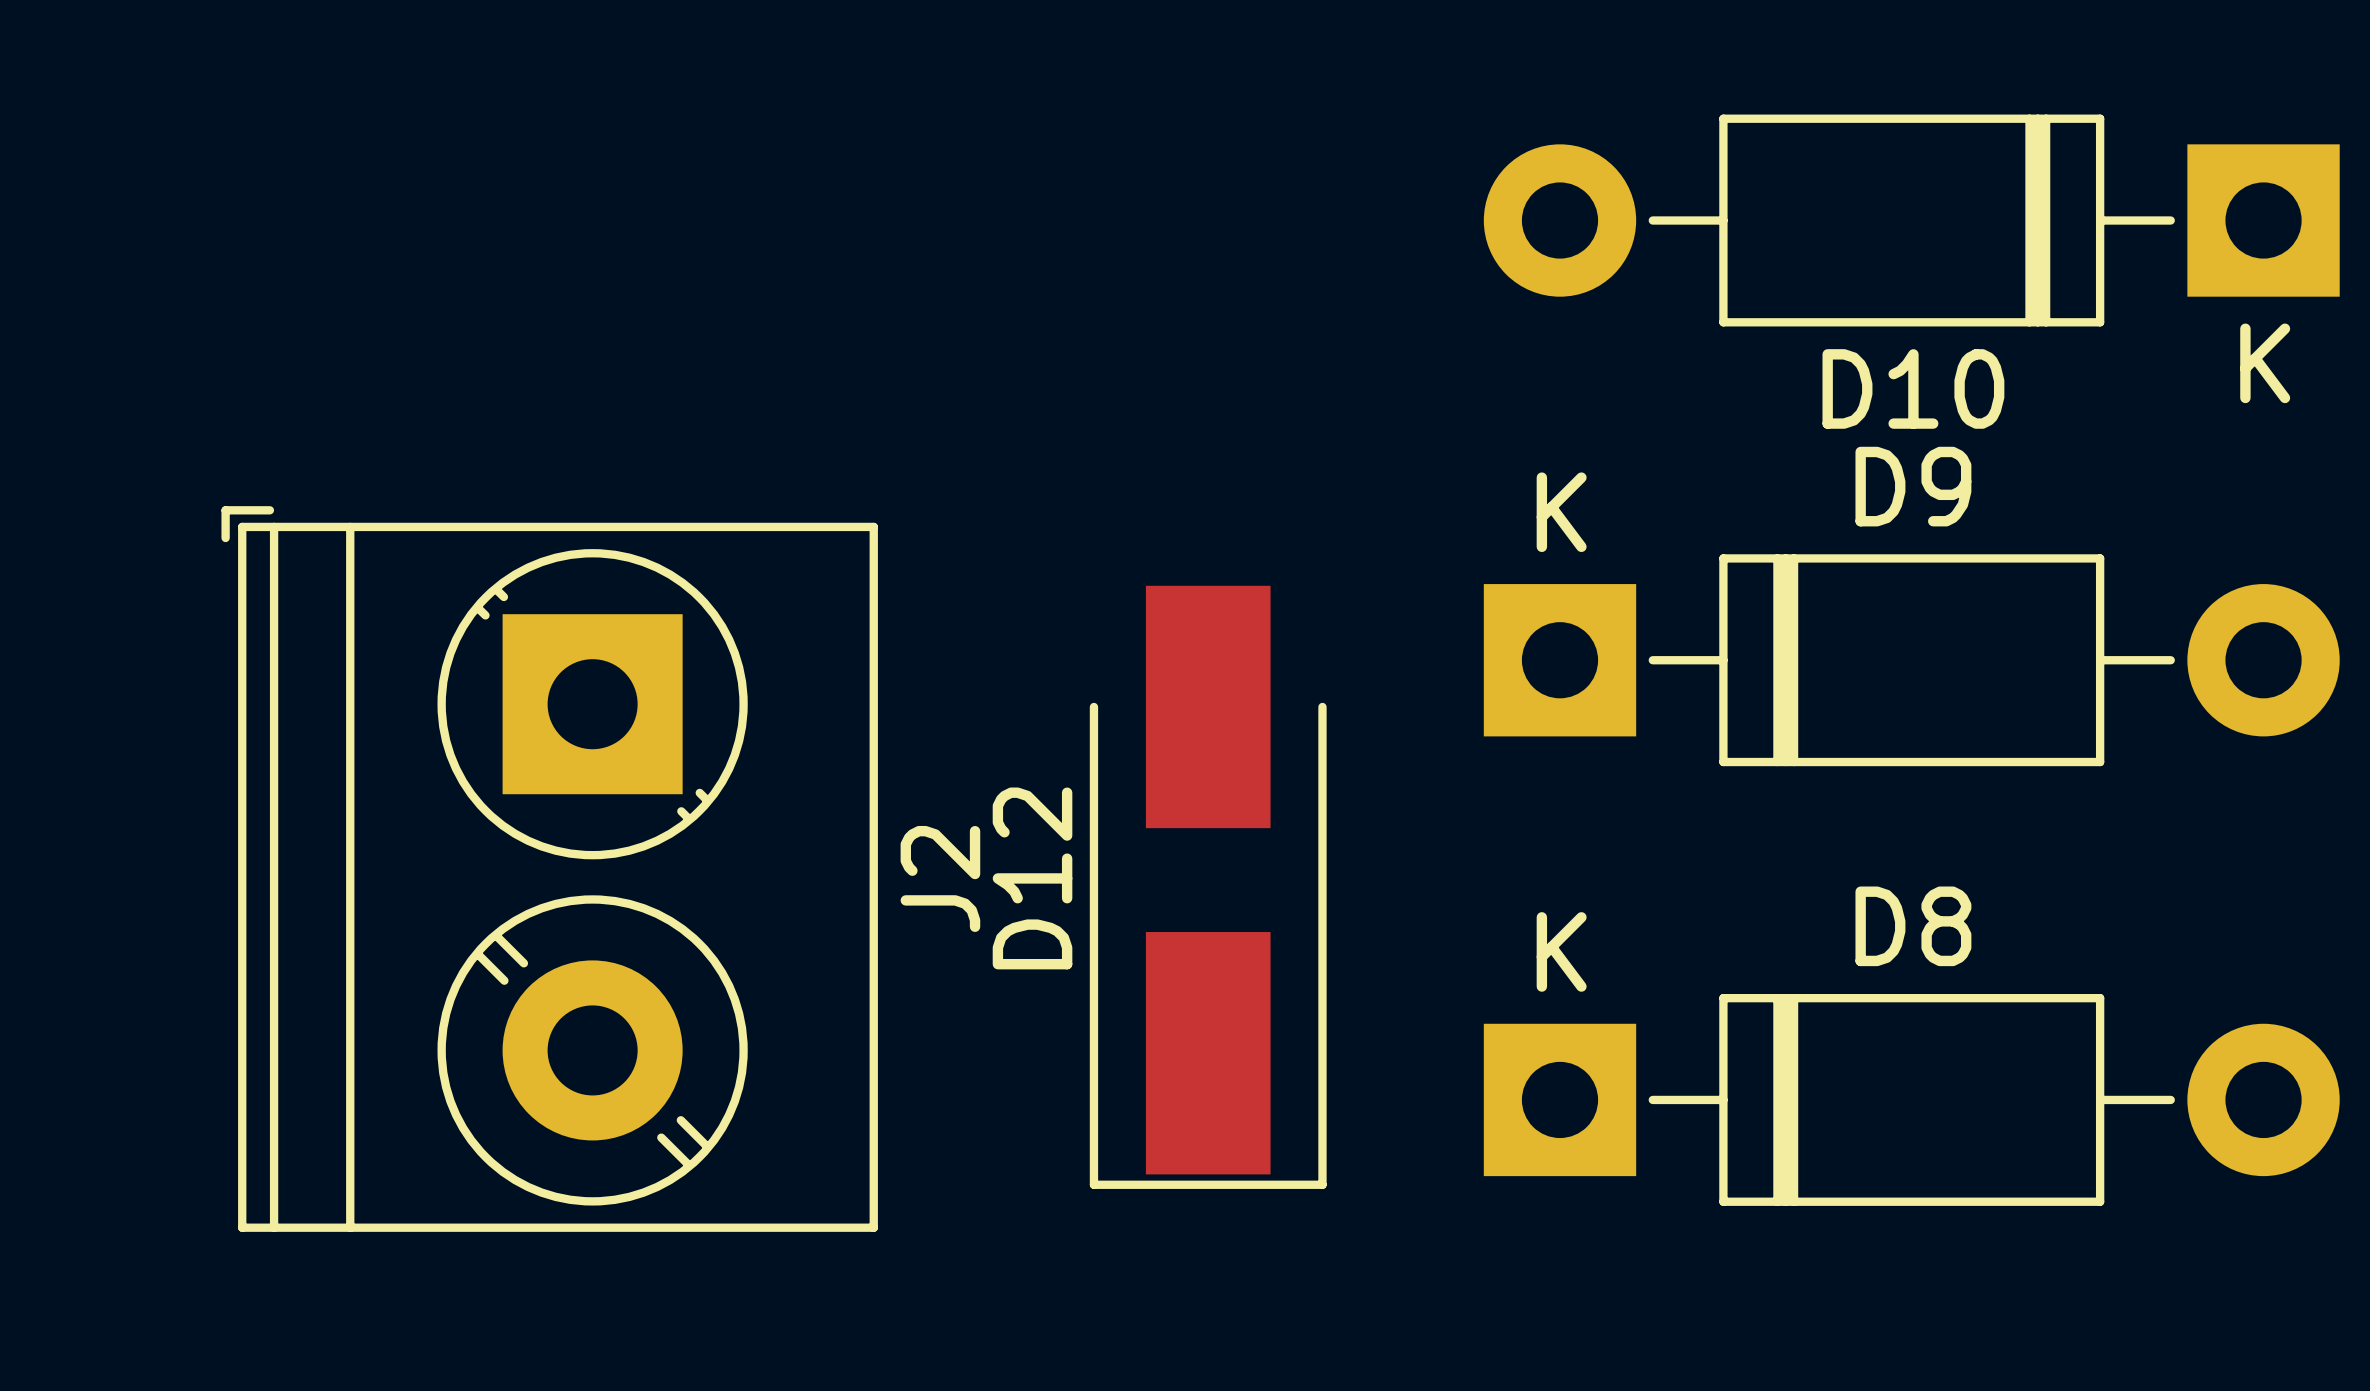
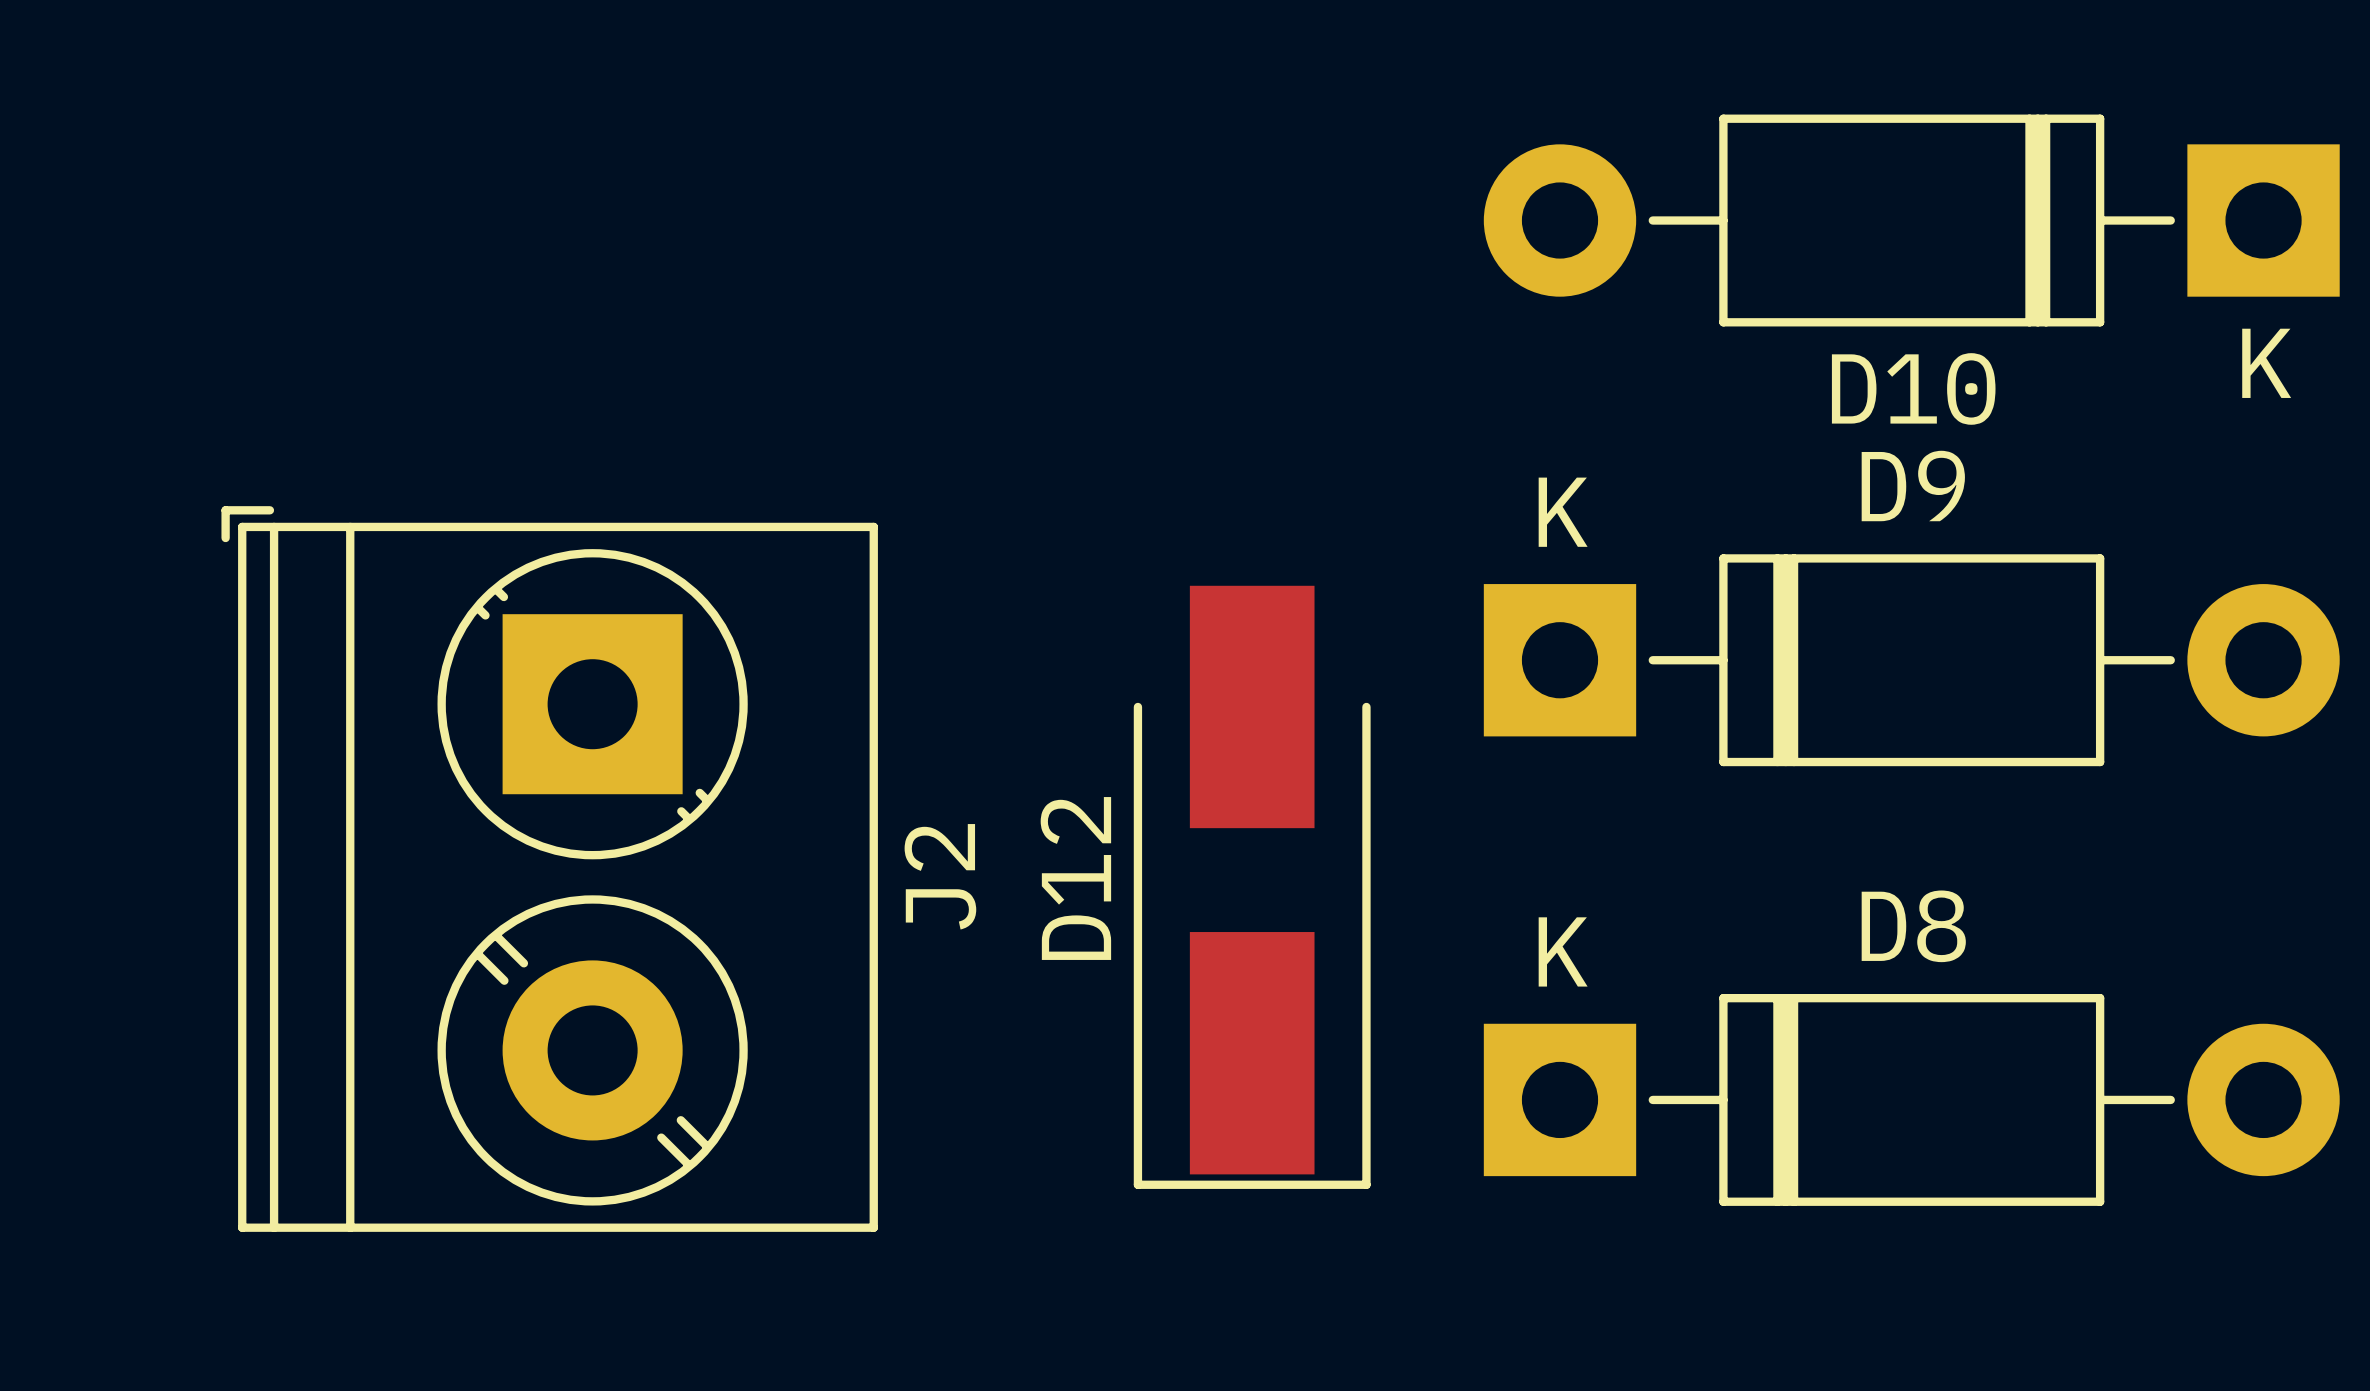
D12 position: (1208, 887) -> (1252, 887)

